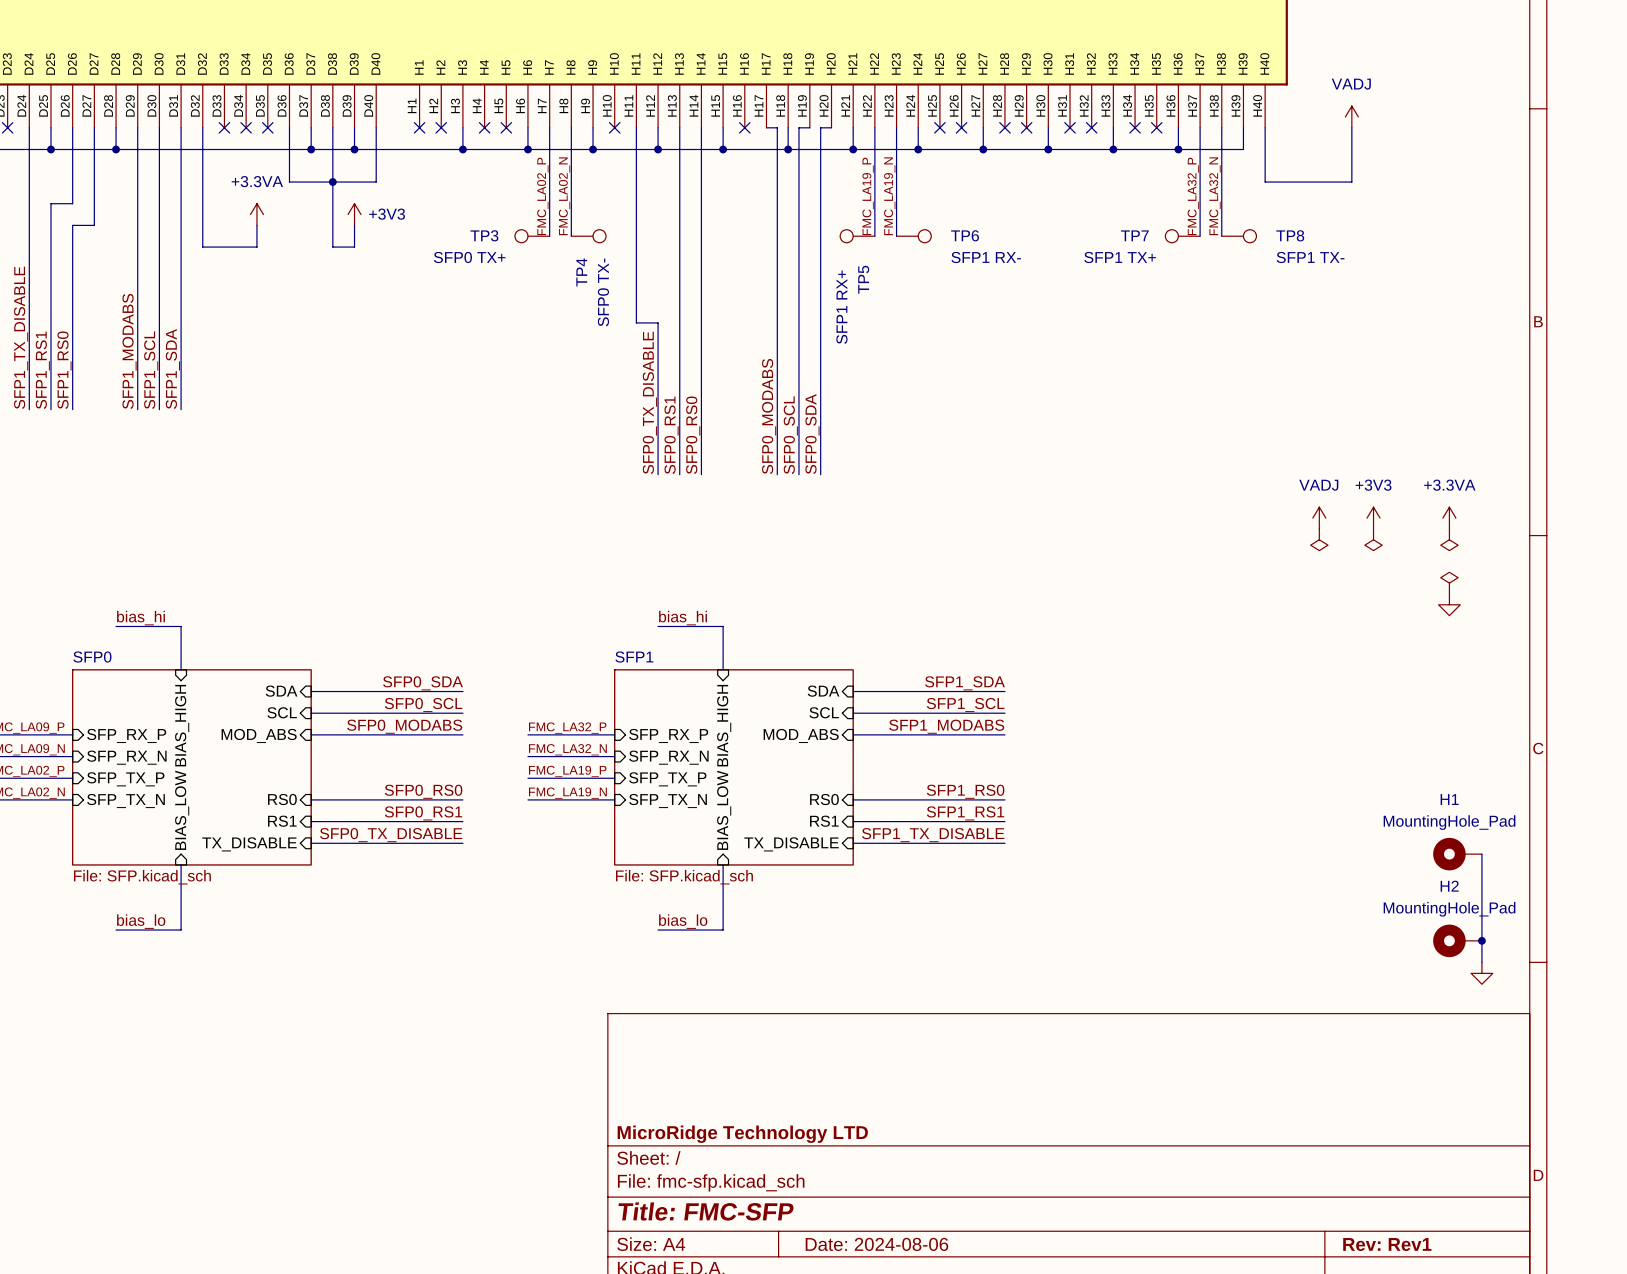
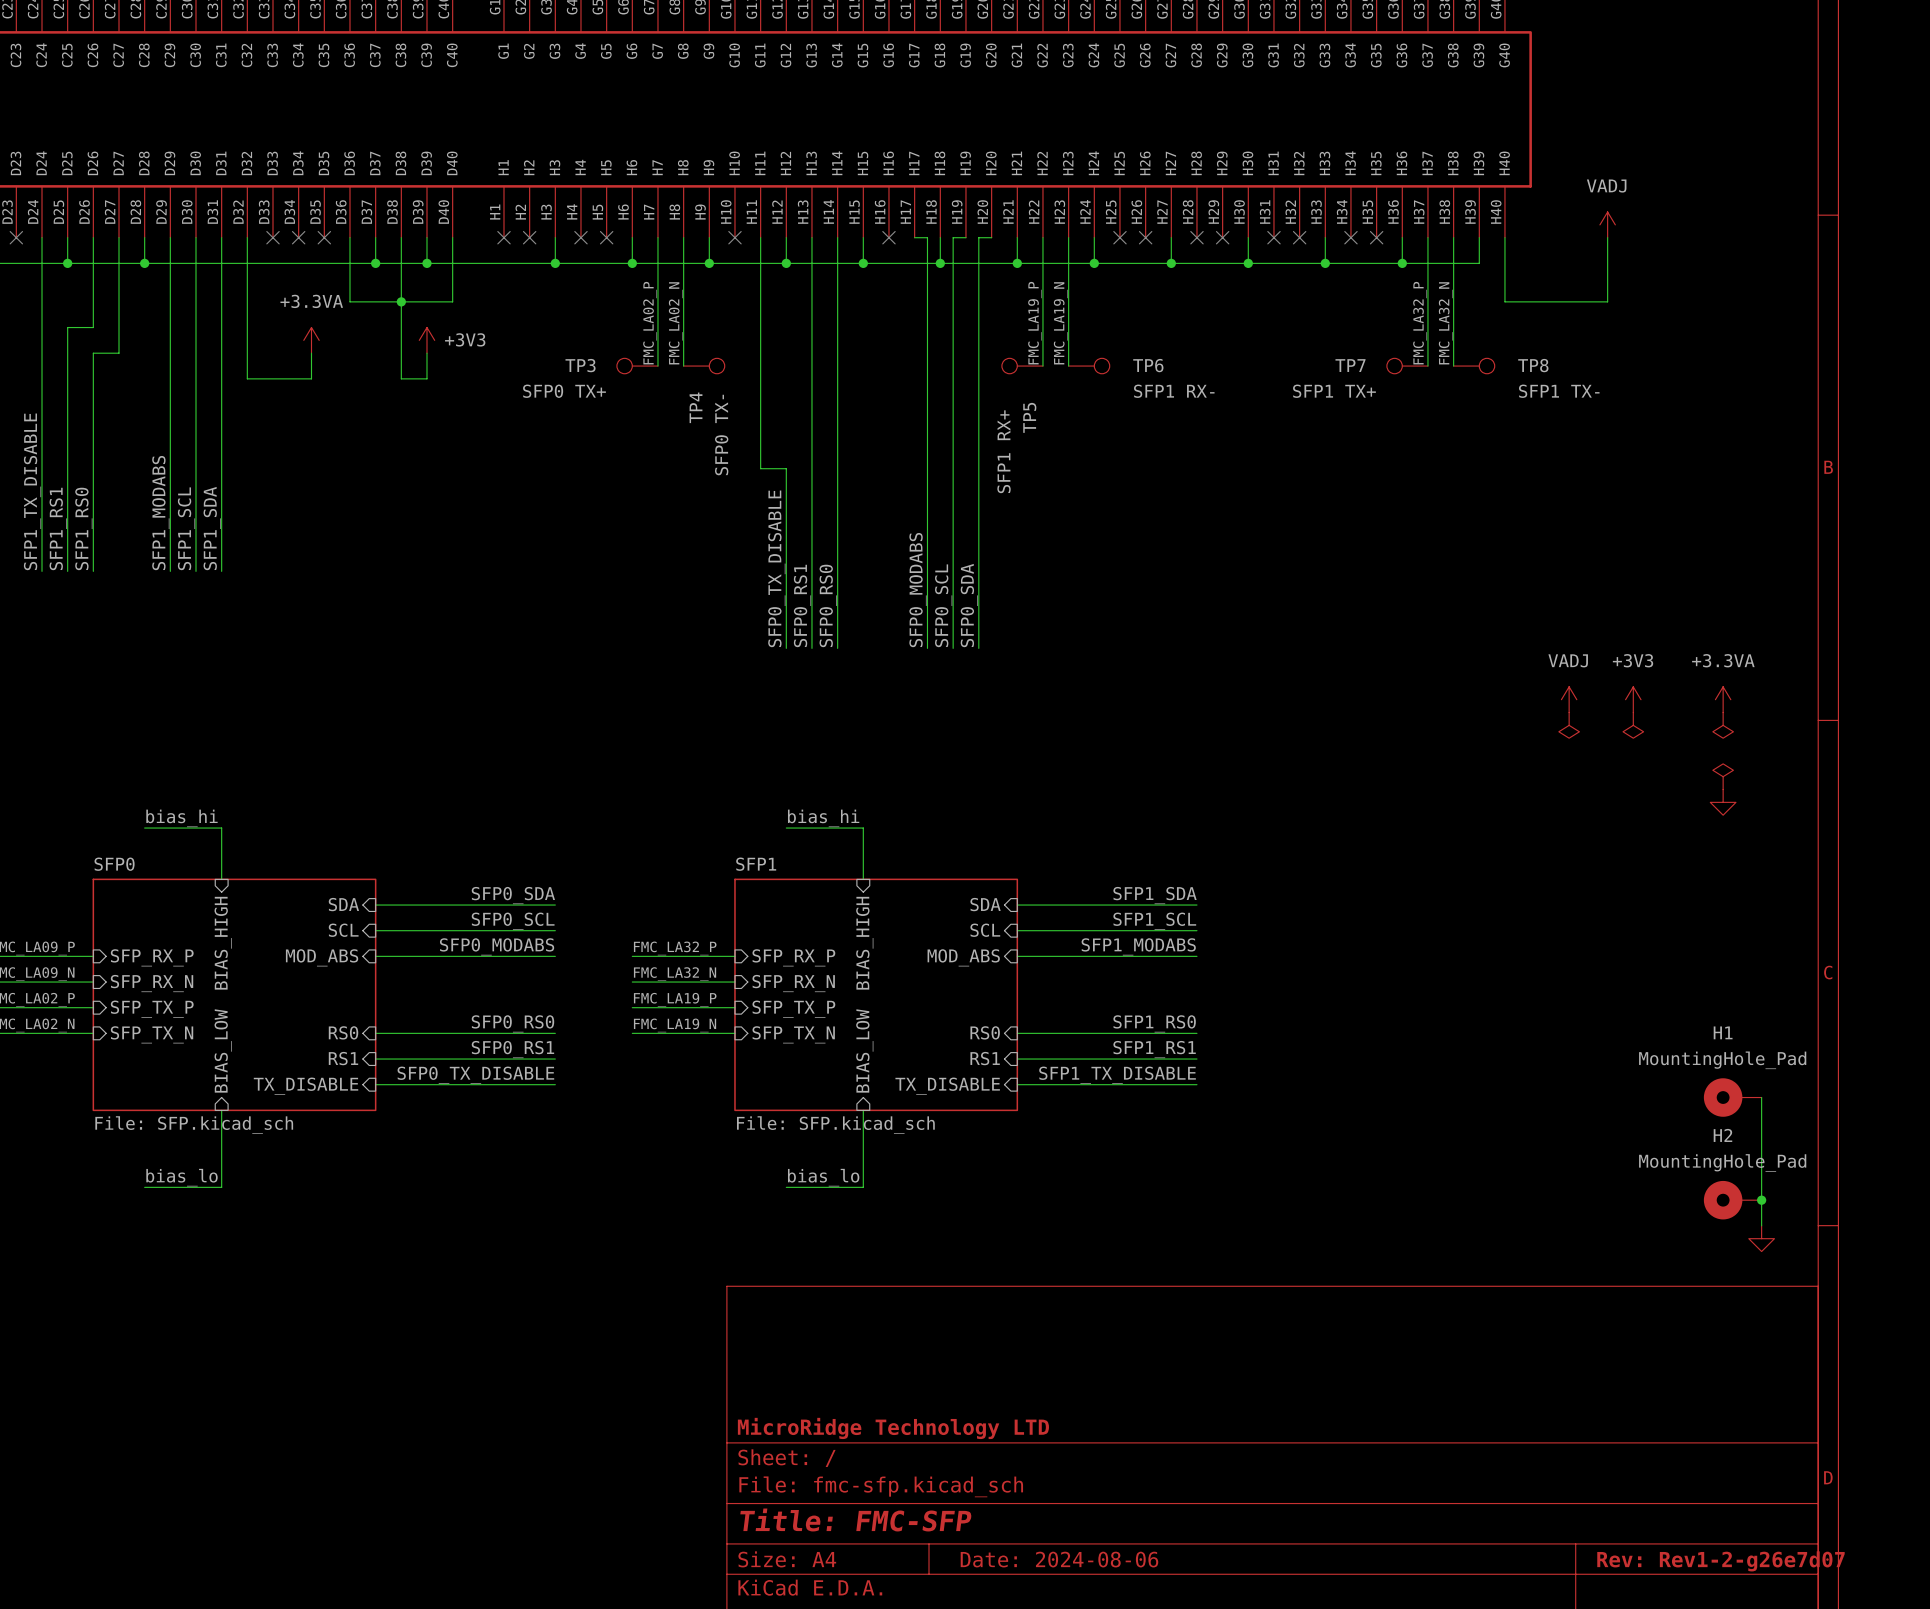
title block: Rev: Rev1 (1387, 1244) -> Rev: Rev1-2-g26e7d07 (1720, 1561)

